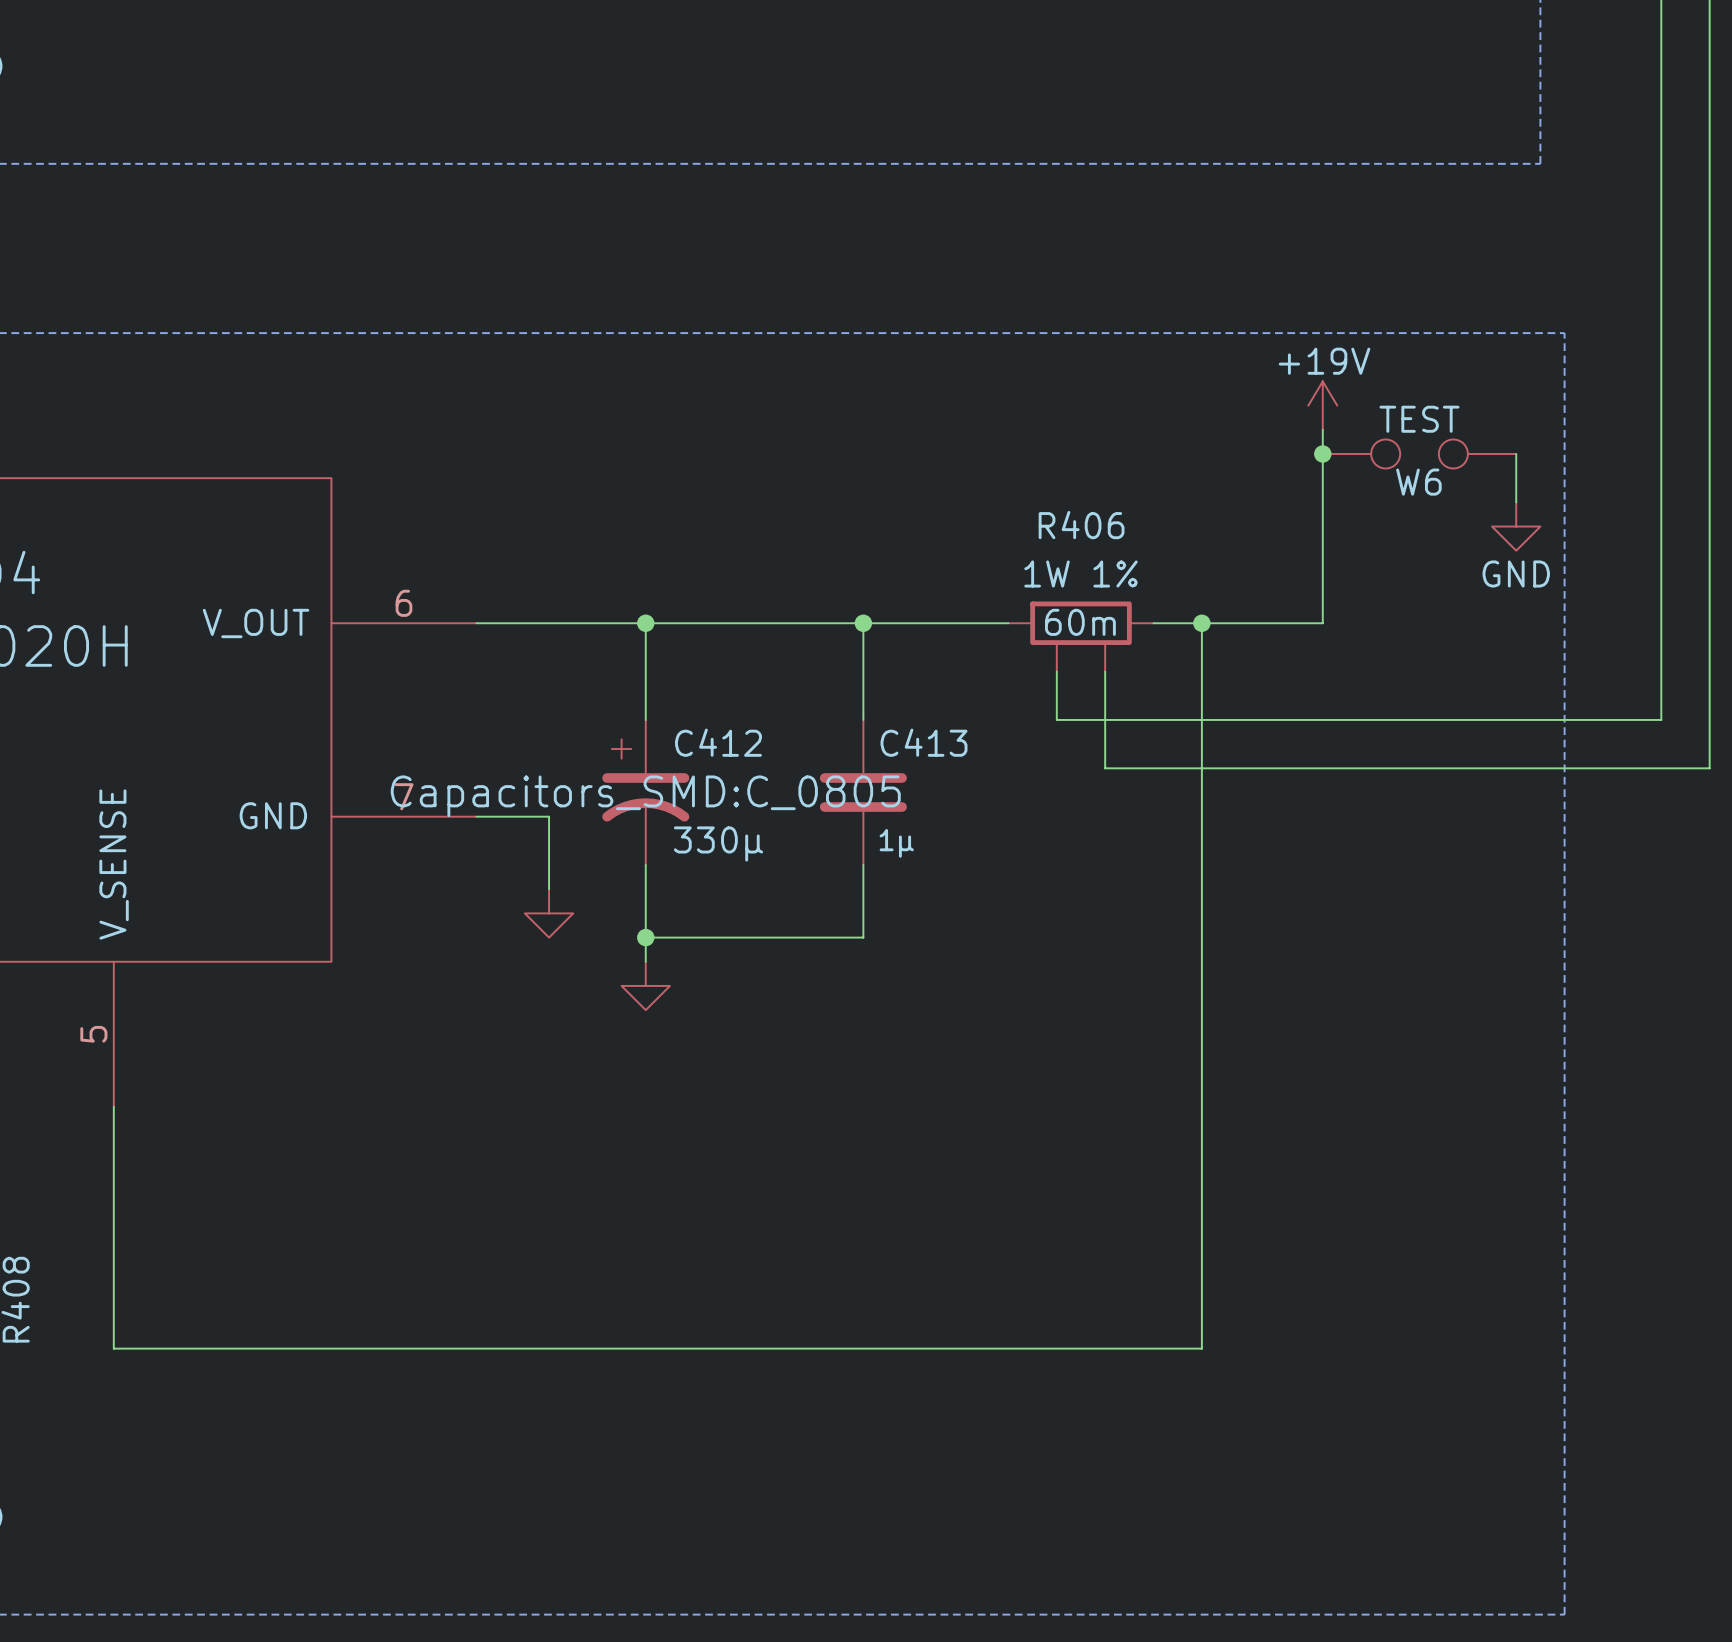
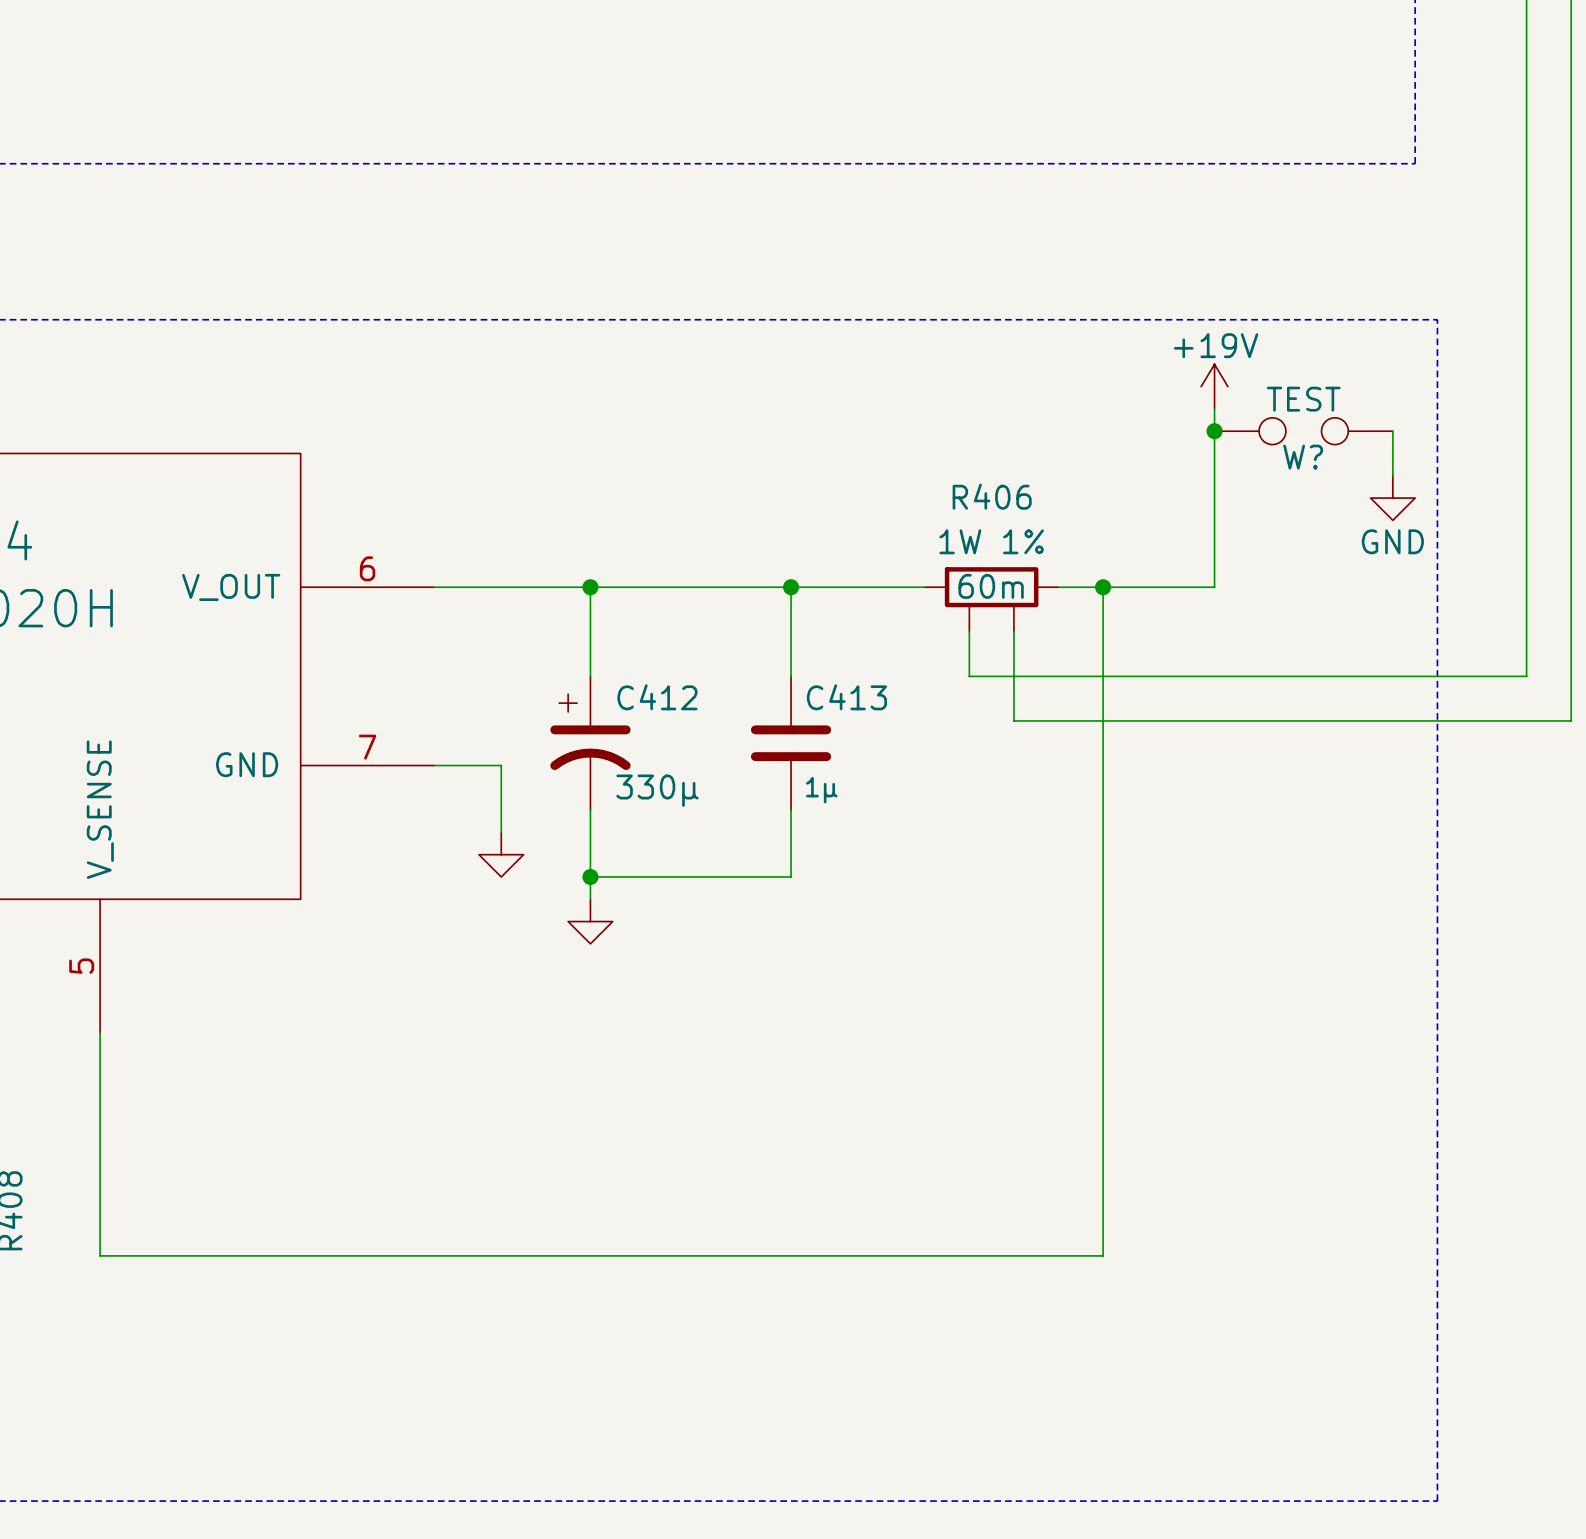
W6 name: W6 (1418, 482) -> W? (1303, 457)
C412 text: Capacitors_SMD:C_0805 (645, 796) -> none

